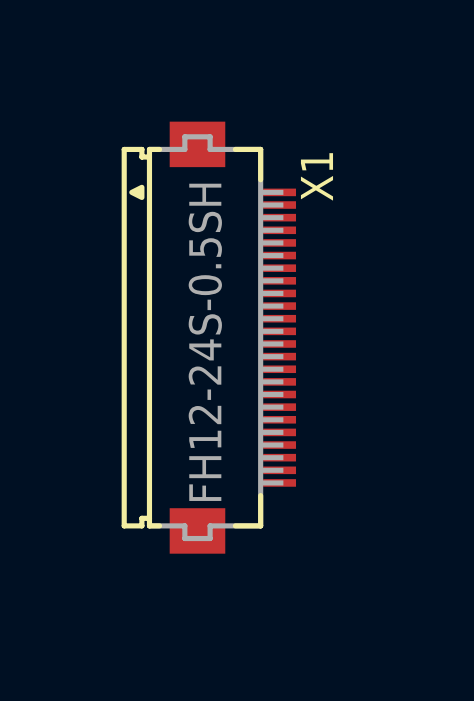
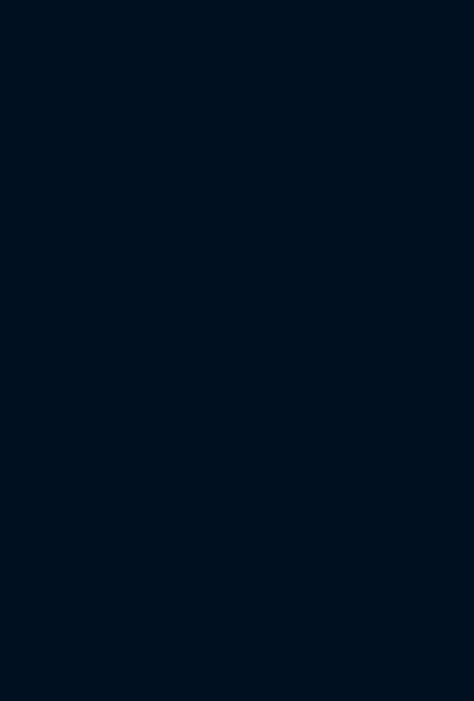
X1: FH12-24S-0.5SH (208, 337) -> none

